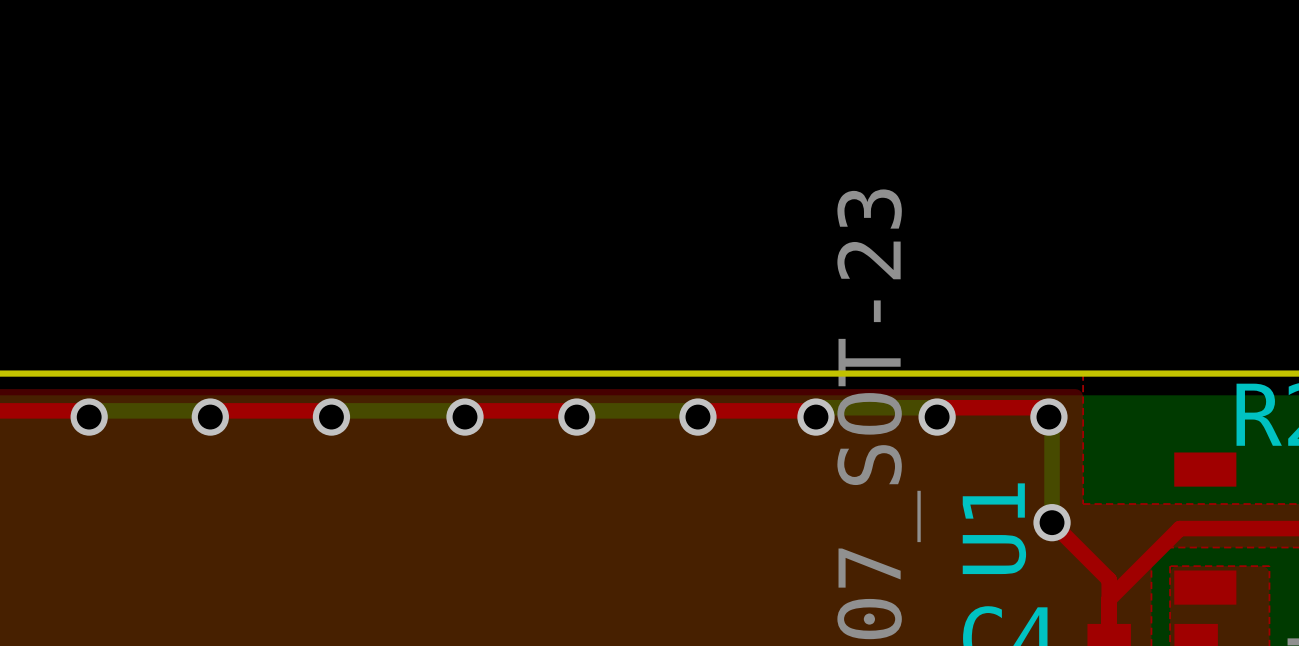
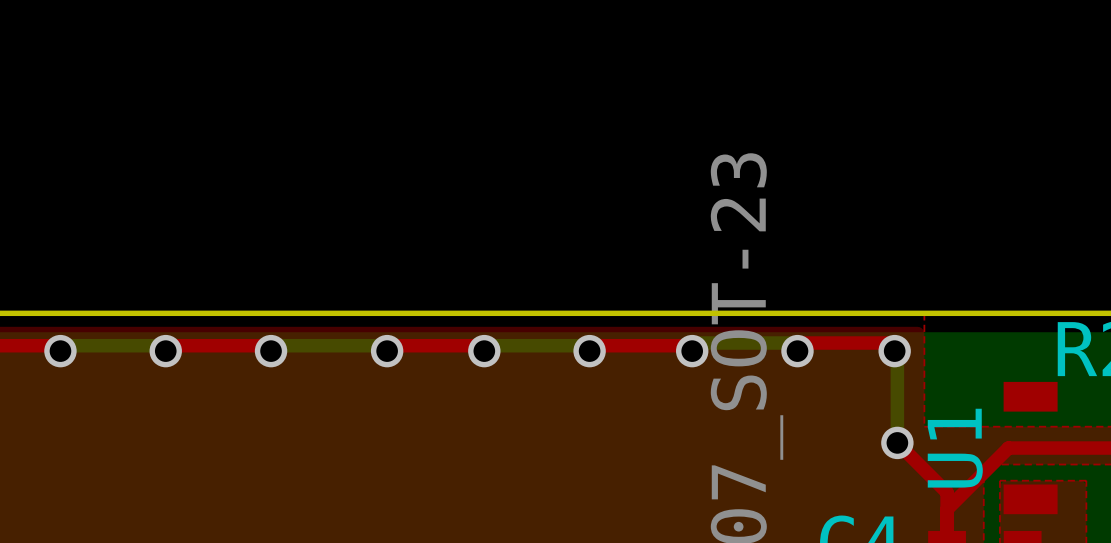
U1 name position: U1 (994, 528) -> U1 (955, 448)

